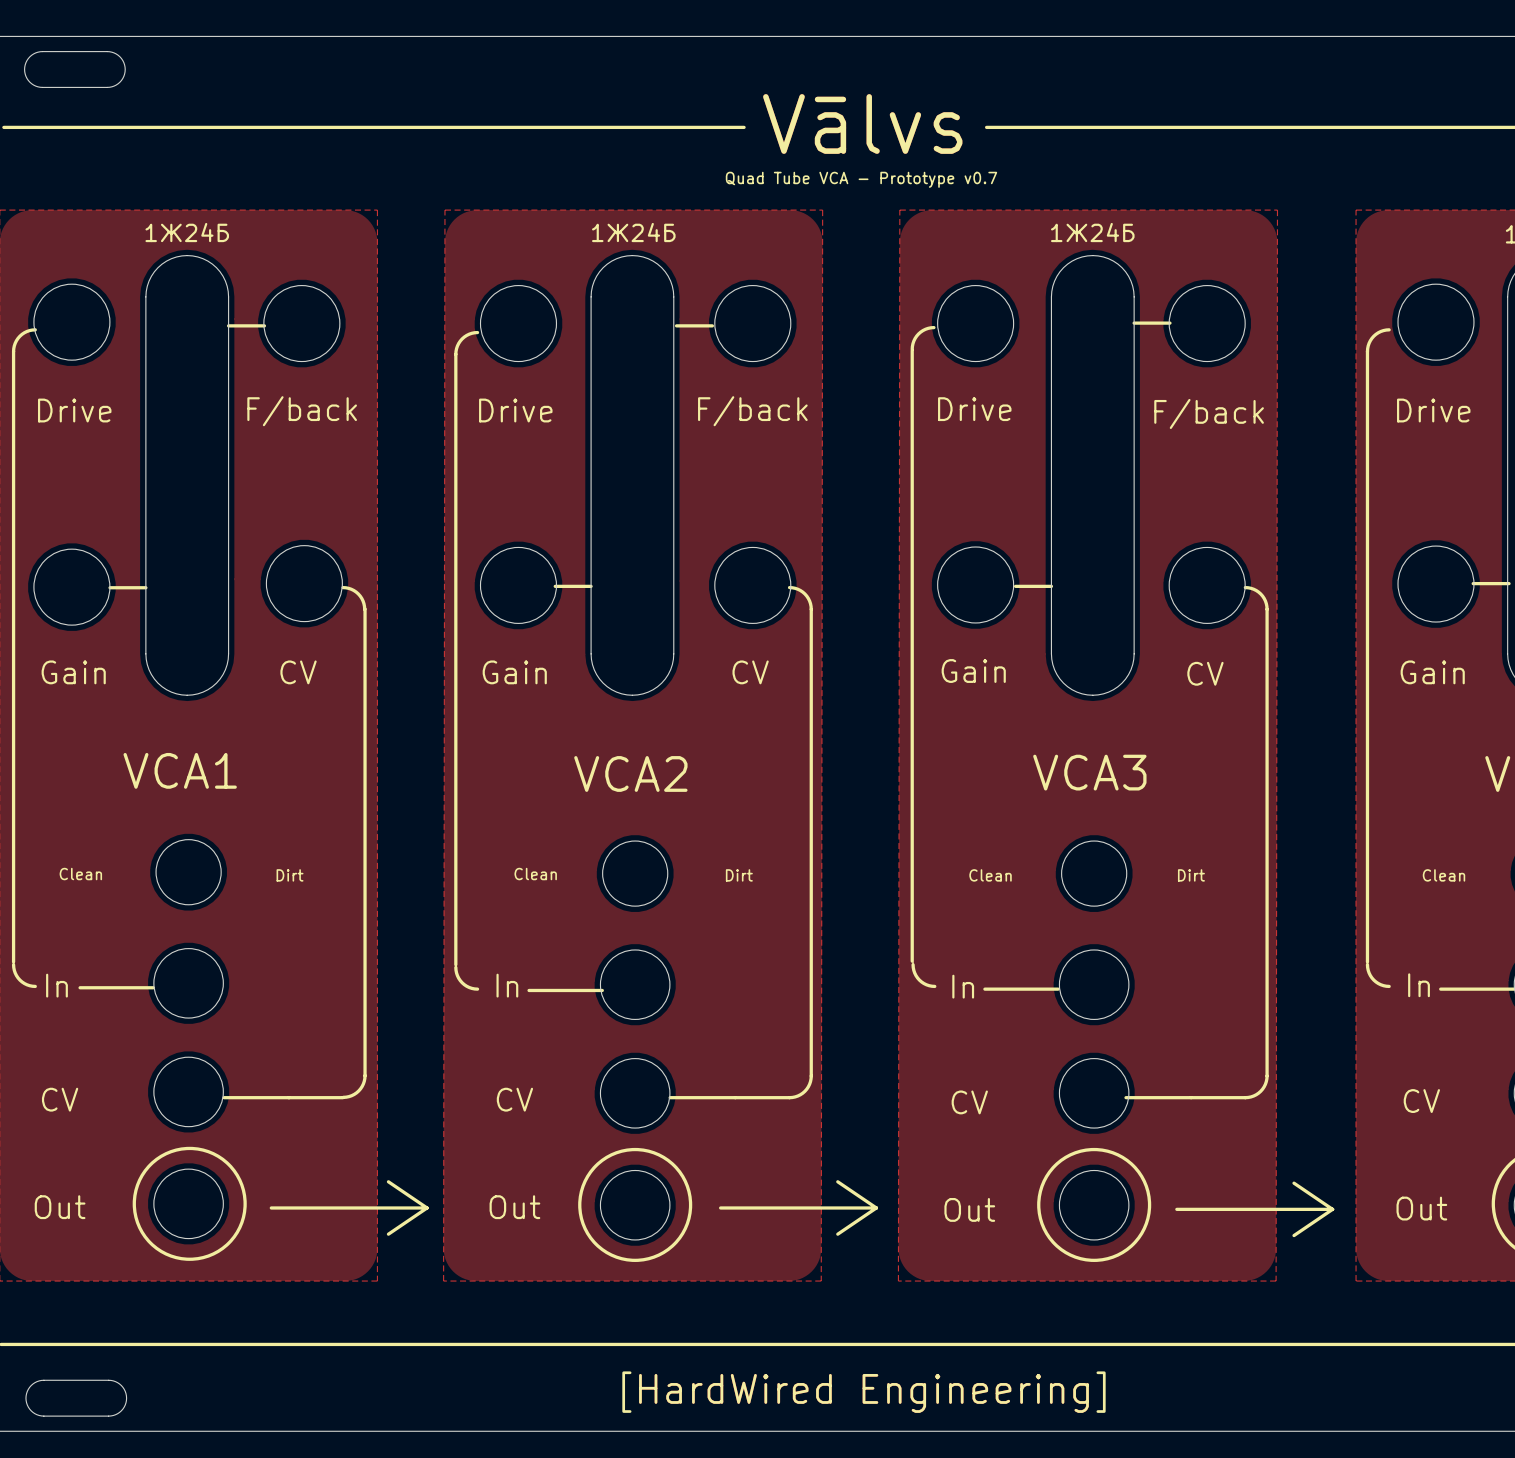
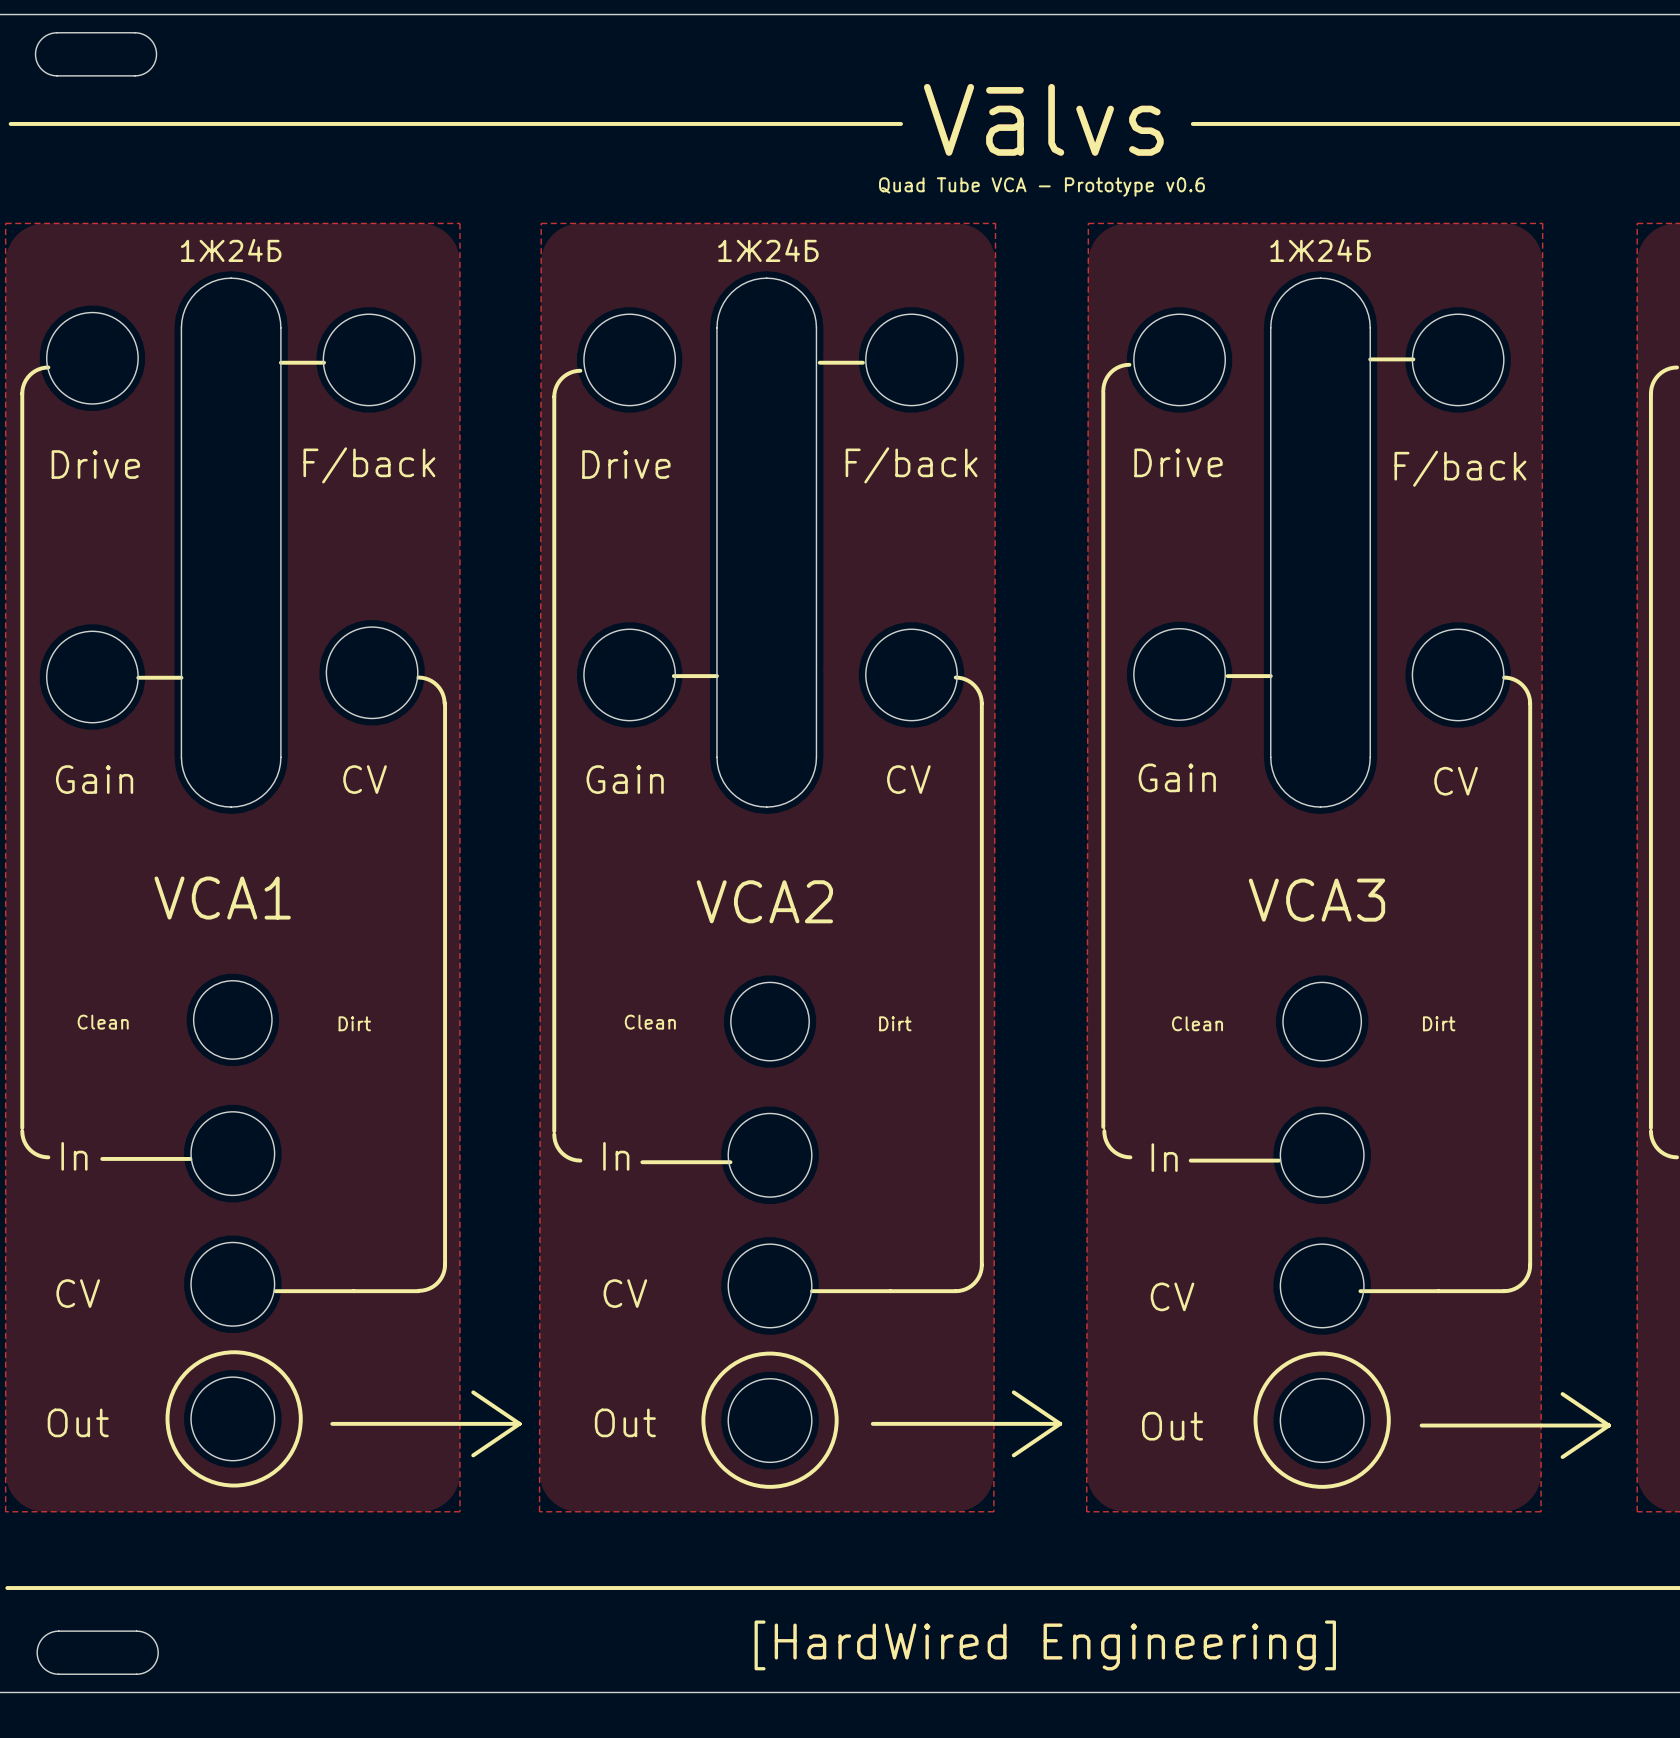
text: Quad Tube VCA - Prototype v0.7 (861, 179) -> Quad Tube VCA - Prototype v0.6 (1041, 186)

